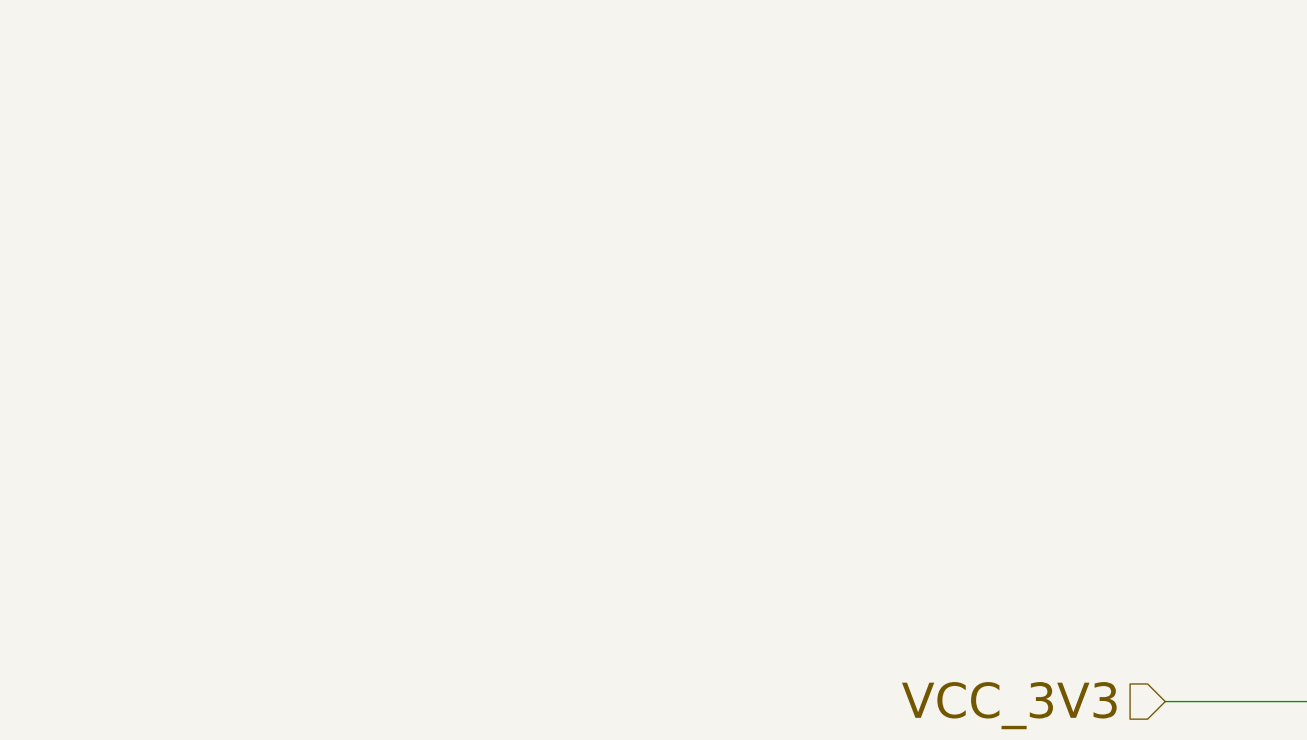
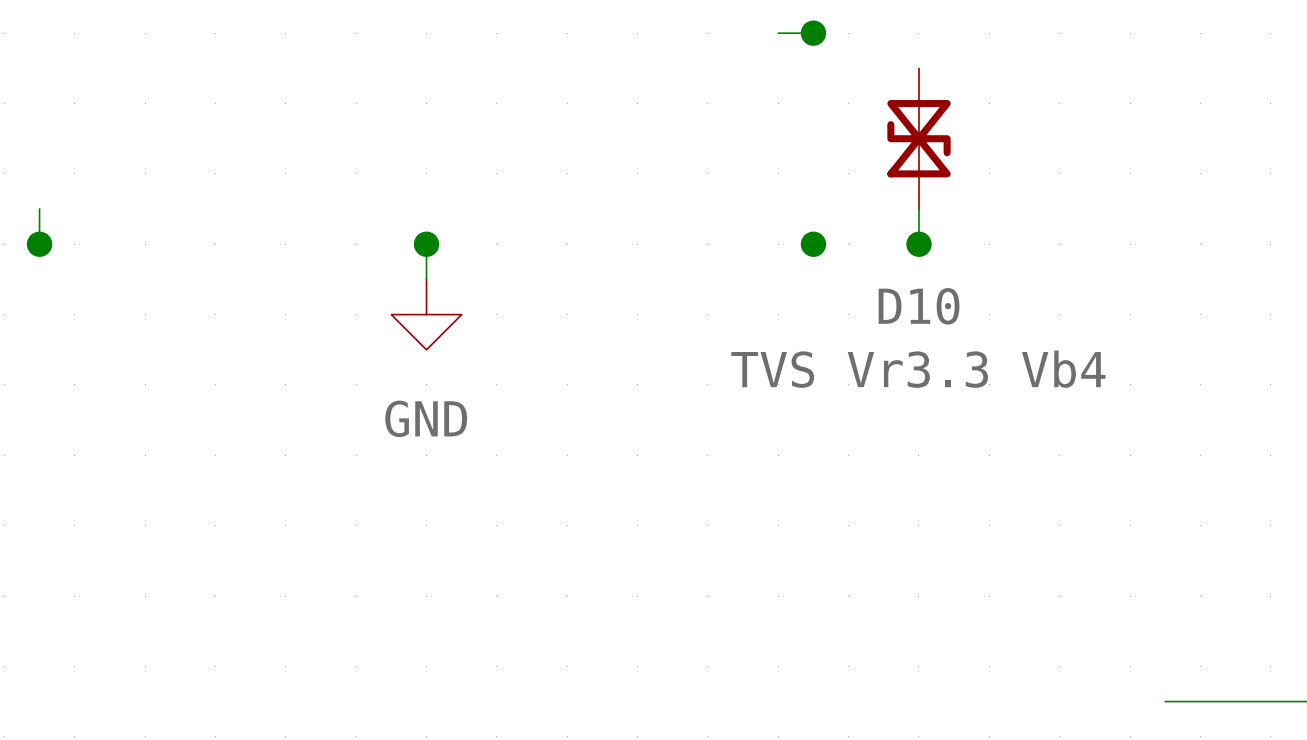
wire: none -> (778, 33) (813, 33)
junction: none -> (813, 33)
D10: none -> TVS Vr3.3 Vb4 (918, 138)
wire: none -> (39, 209) (39, 244)
wire: none -> (918, 209) (918, 244)
junction: none -> (39, 244)
wire: none -> (426, 244) (426, 279)
junction: none -> (426, 244)
junction: none -> (813, 244)
junction: none -> (918, 244)
power symbol: none -> GND (426, 314)
hierarchical label: VCC_3V3 (1009, 705) -> none

